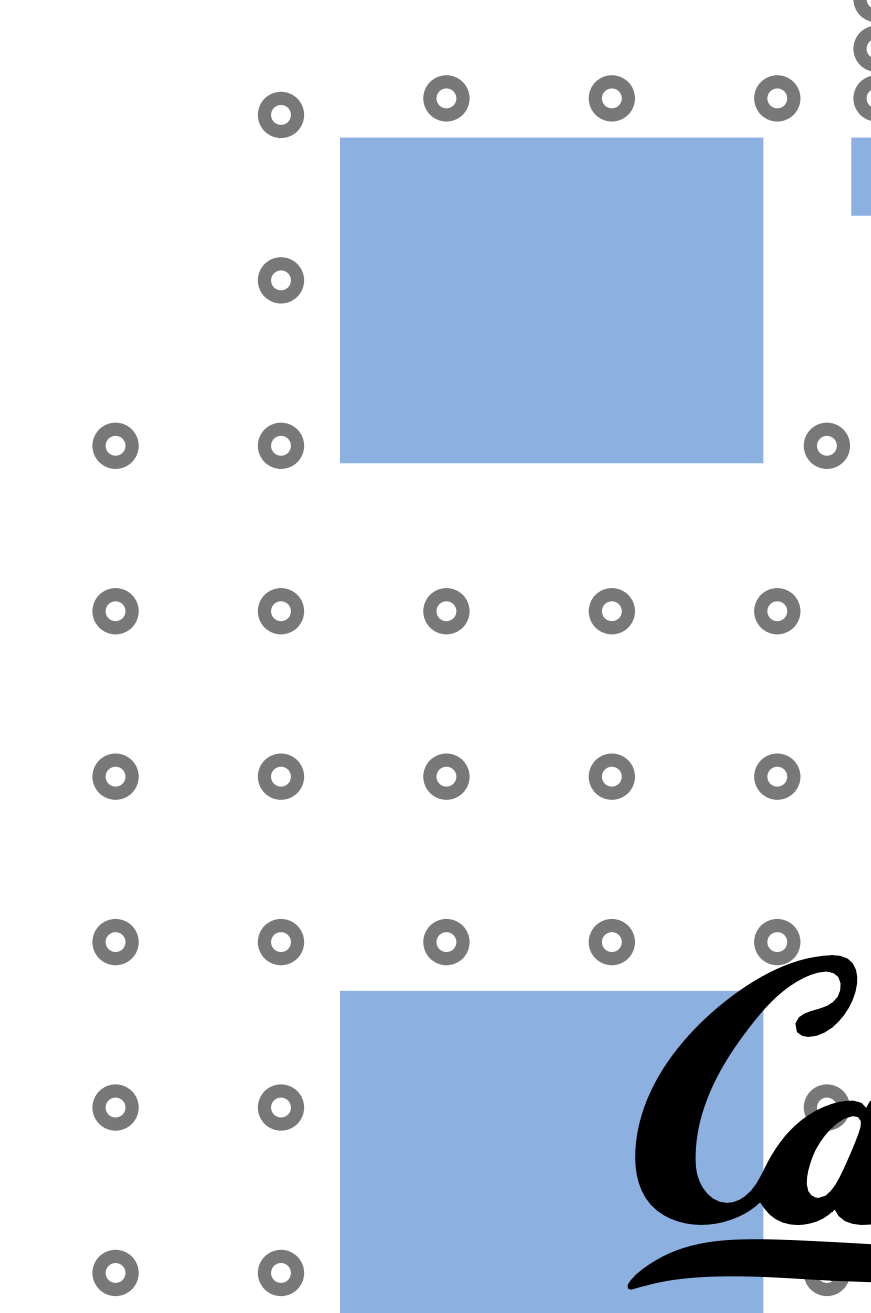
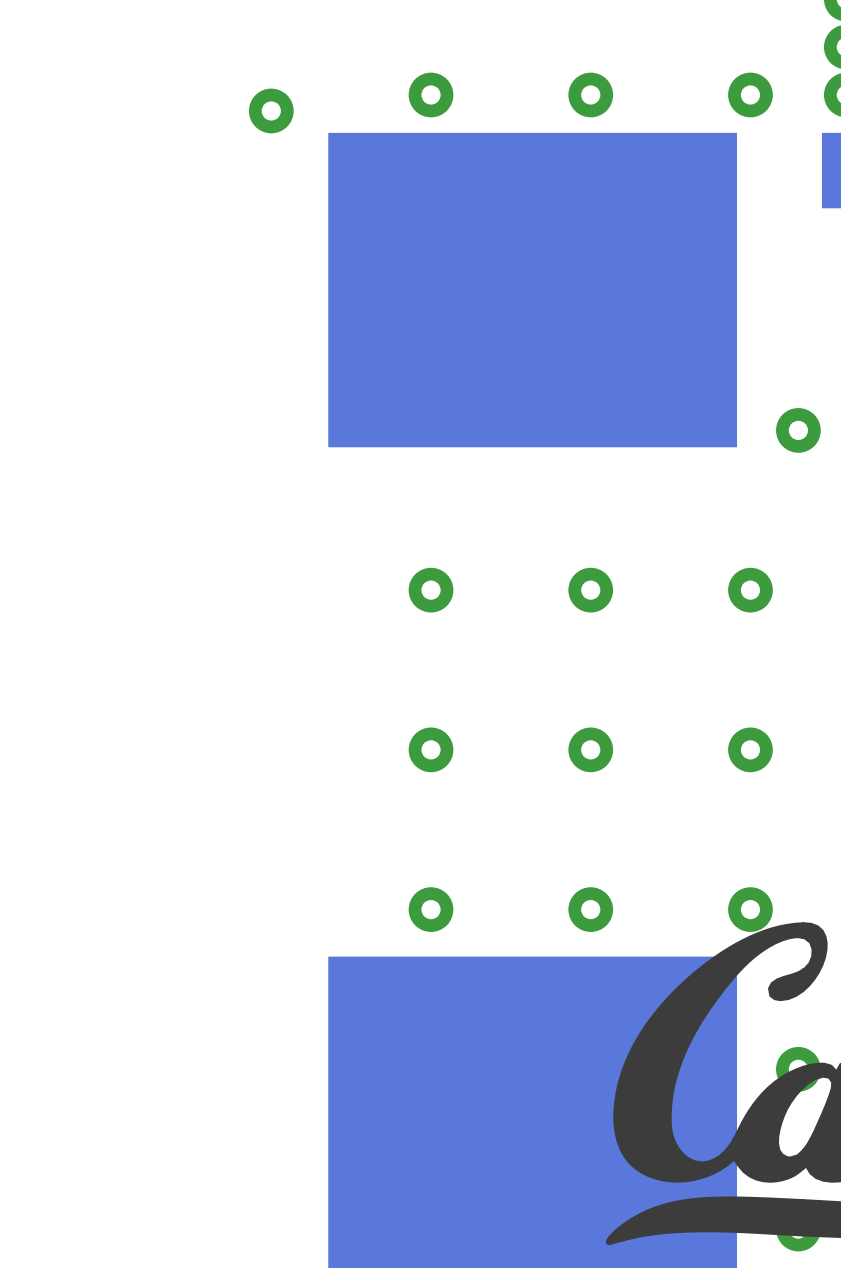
via: (280, 280) -> none
via: (115, 445) -> none
via: (280, 445) -> none
via: (115, 611) -> none
via: (280, 611) -> none
via: (115, 776) -> none
via: (280, 776) -> none
via: (115, 942) -> none
via: (280, 942) -> none
via: (115, 1107) -> none
via: (280, 1107) -> none
via: (115, 1272) -> none
via: (280, 1272) -> none

